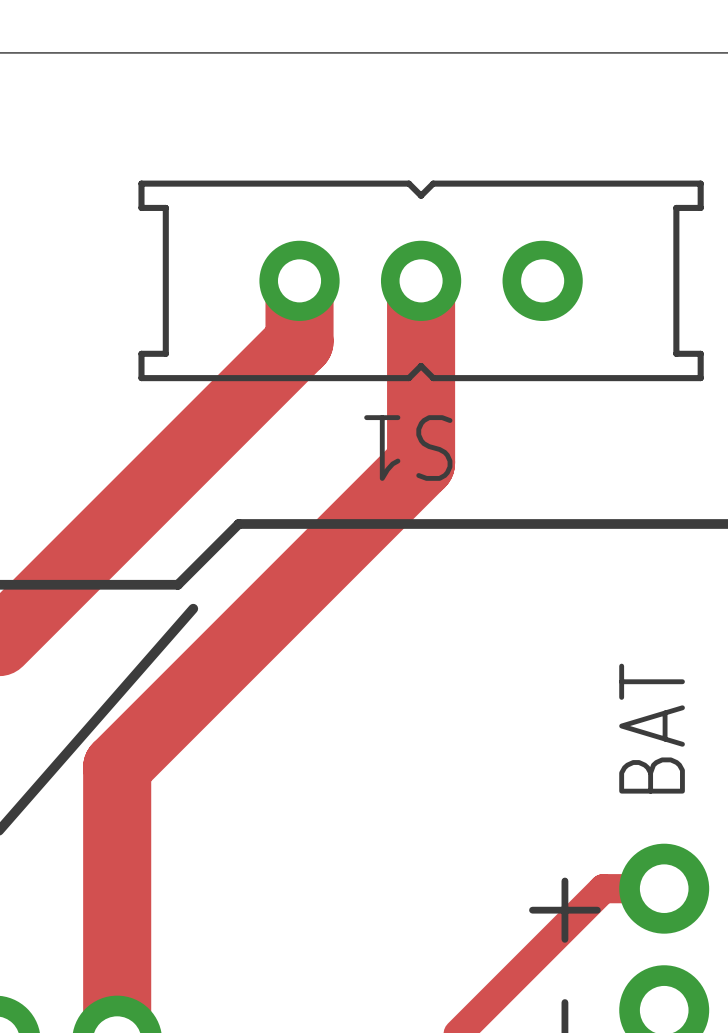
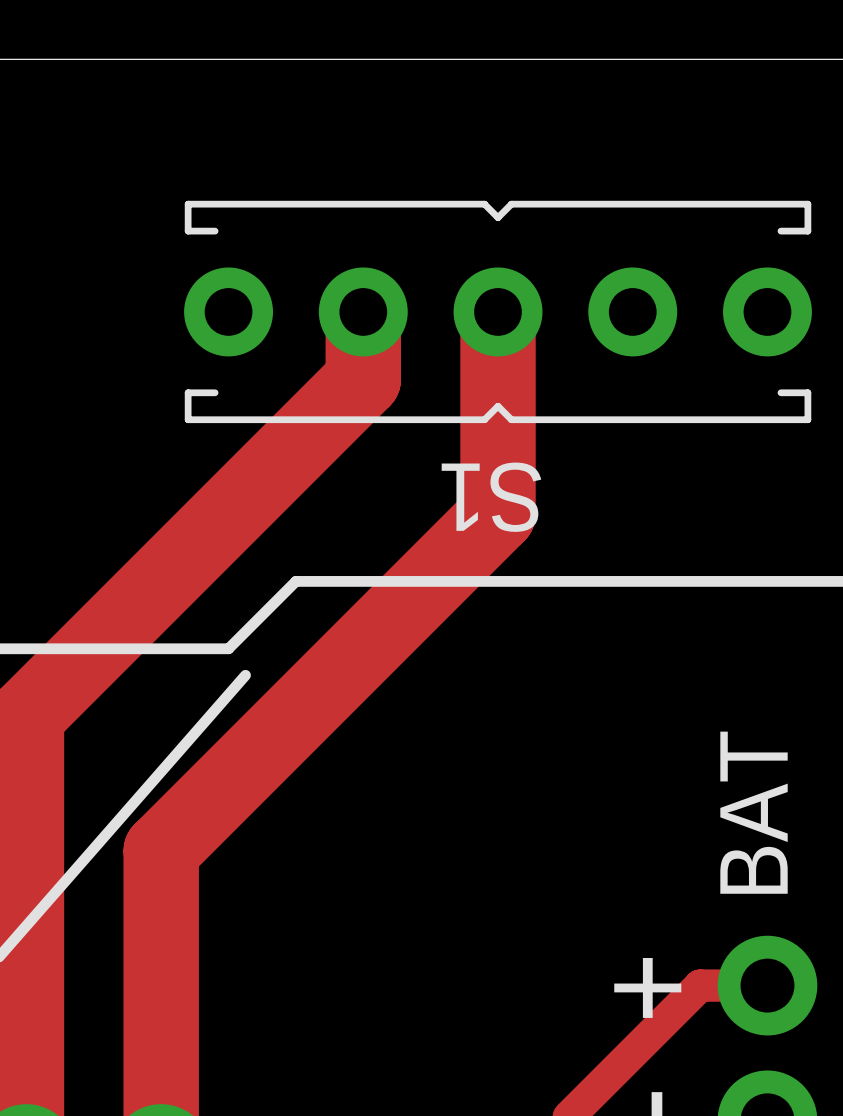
S1 footprint: [138, 180, 704, 382] -> [184, 200, 812, 424]

